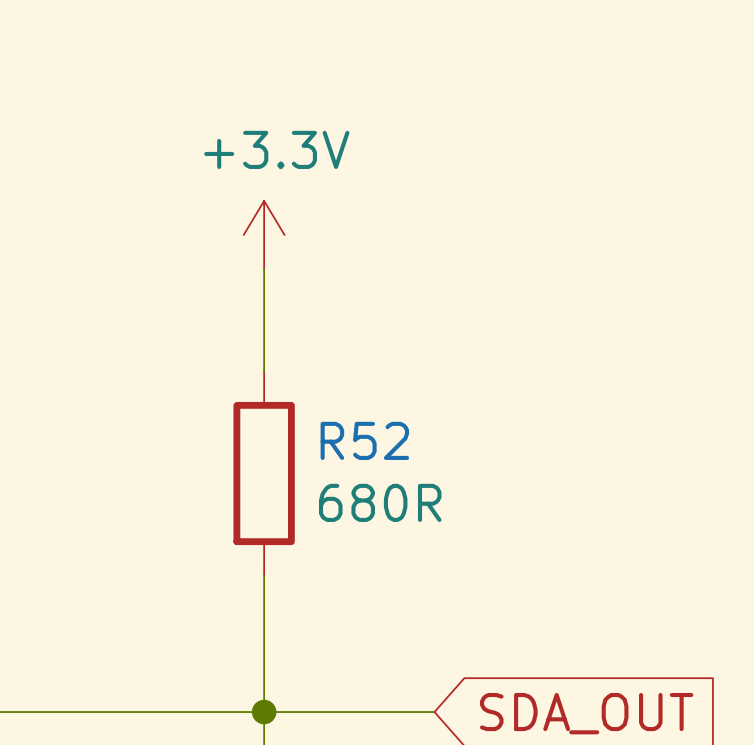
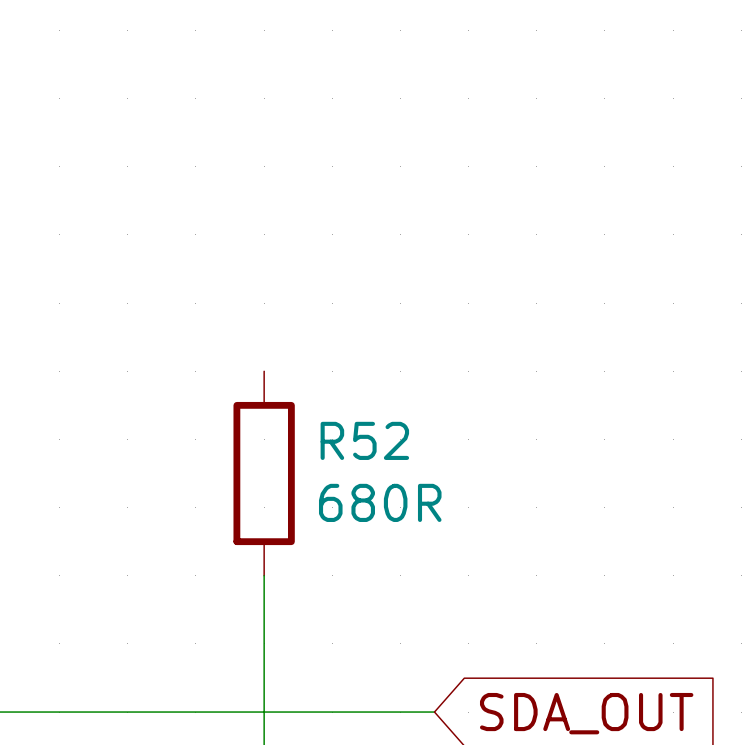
power symbol: +3.3V (264, 234) -> none
wire: (264, 269) (264, 371) -> none
junction: (264, 712) -> none

